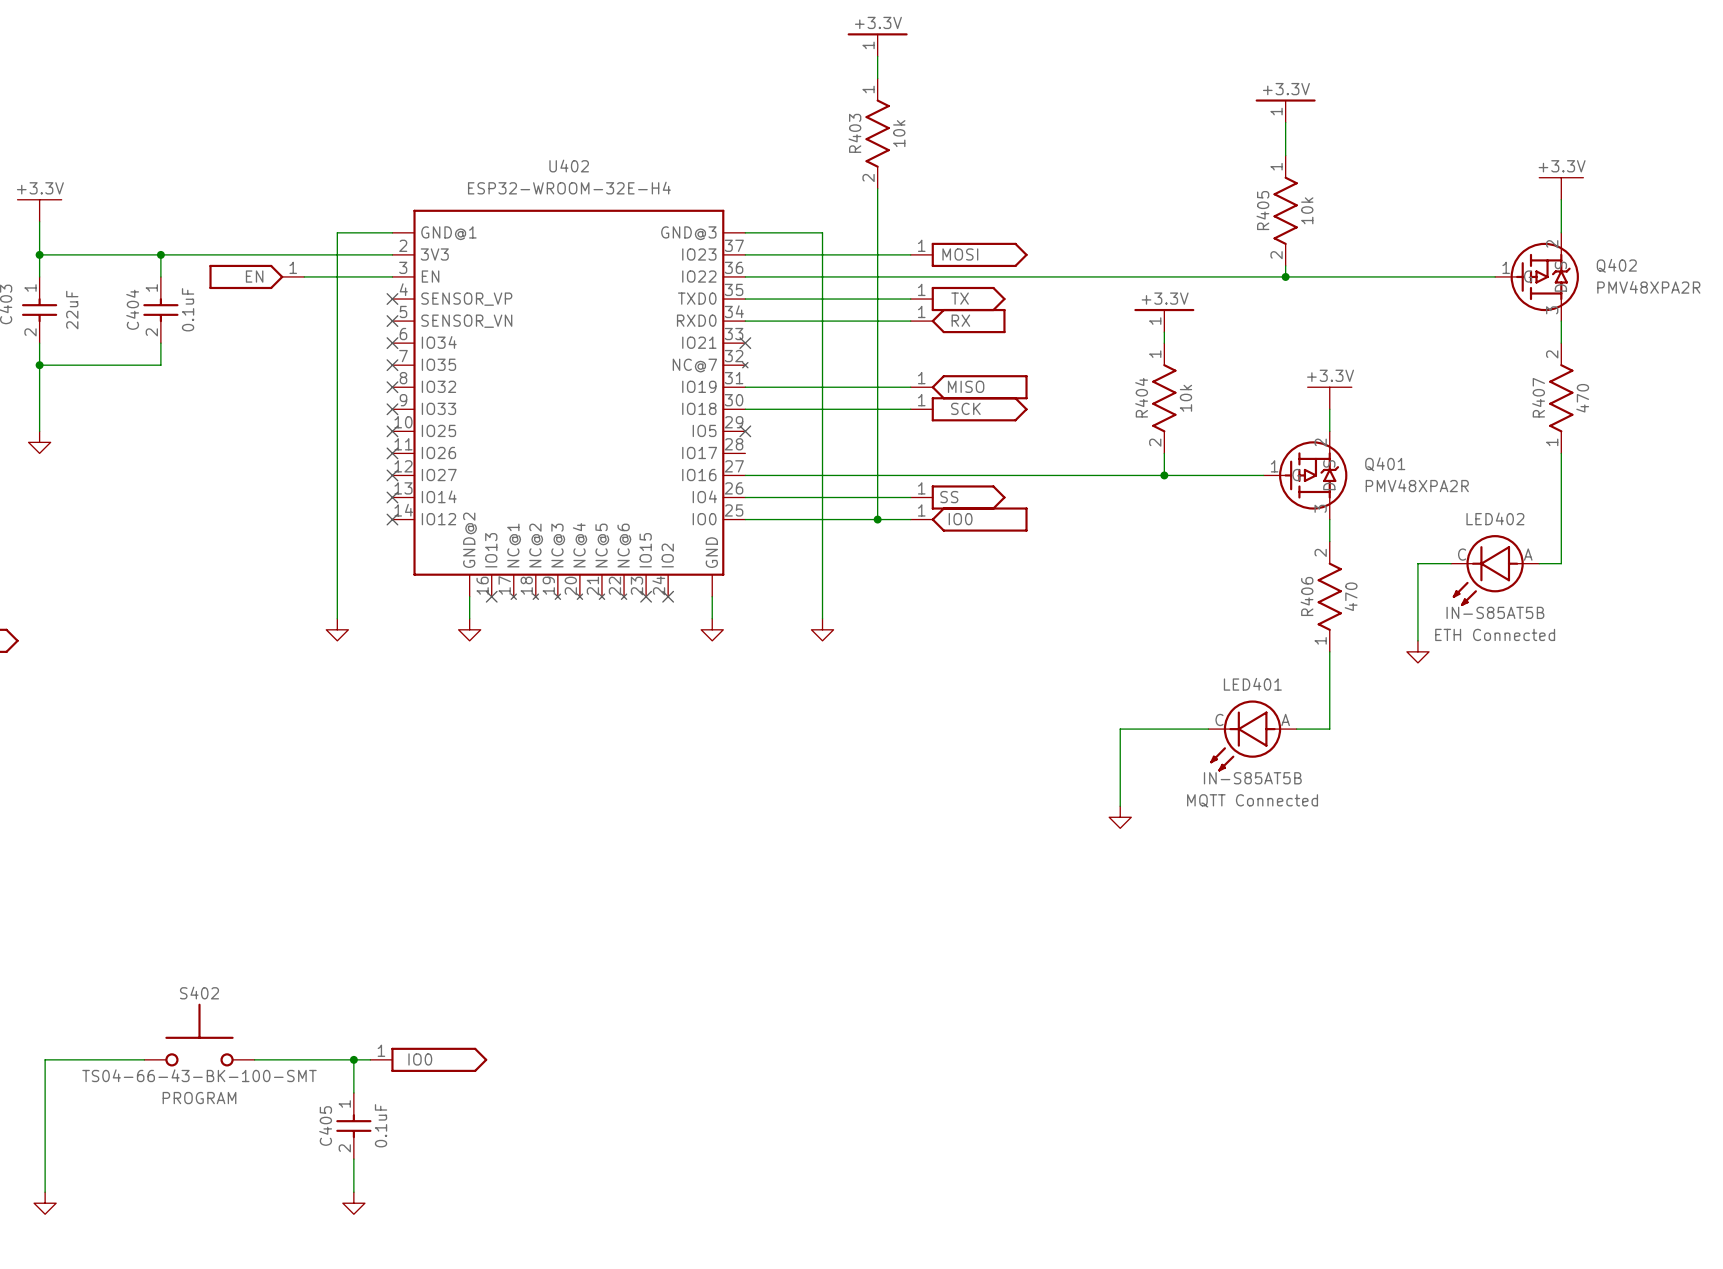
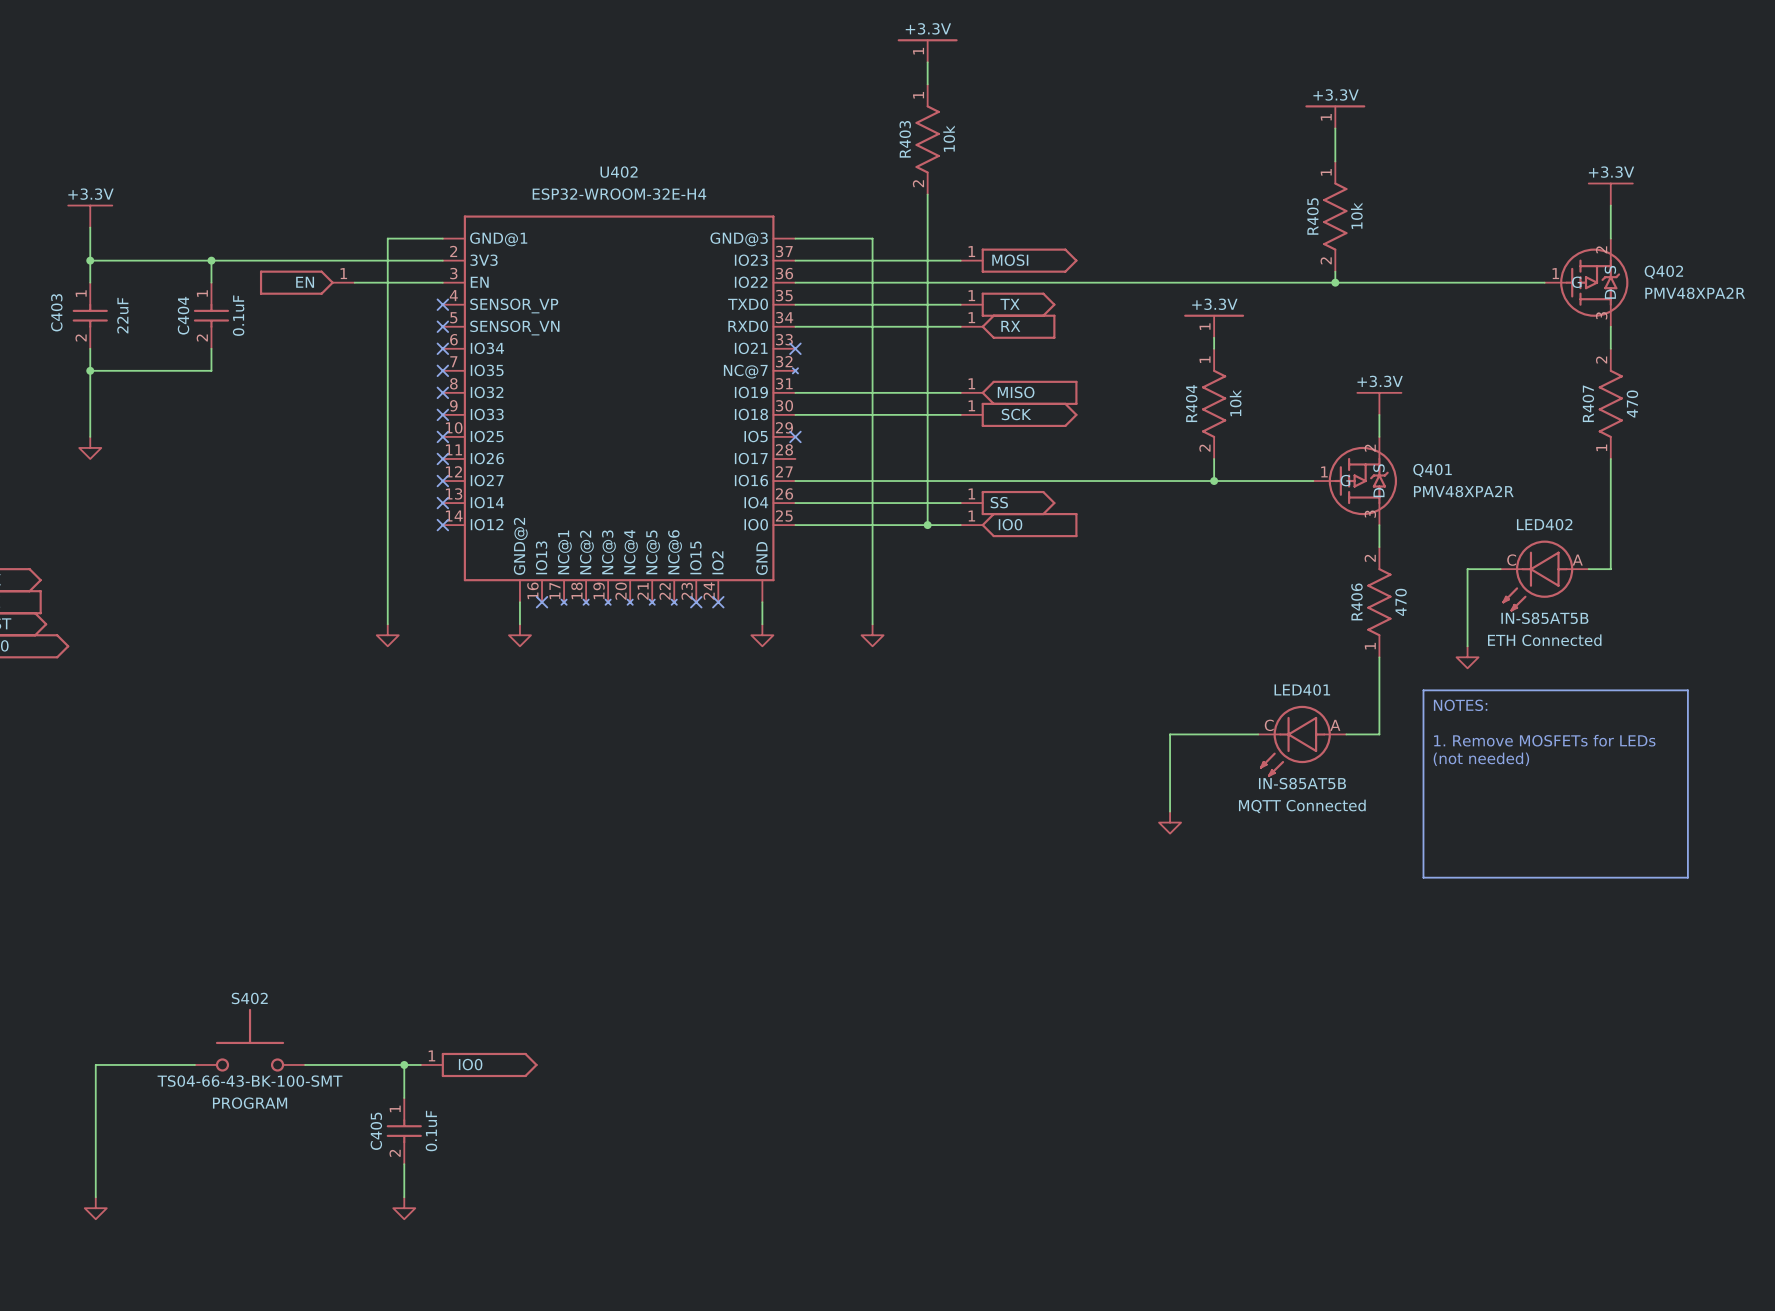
line: none -> (1423, 690) (1687, 690) (1687, 877) (1423, 877) (1423, 690)
text: none -> NOTES: (1460, 705)
text: none -> 1. Remove MOSFETs for LEDs (1544, 740)
text: none -> (not needed) (1481, 759)

